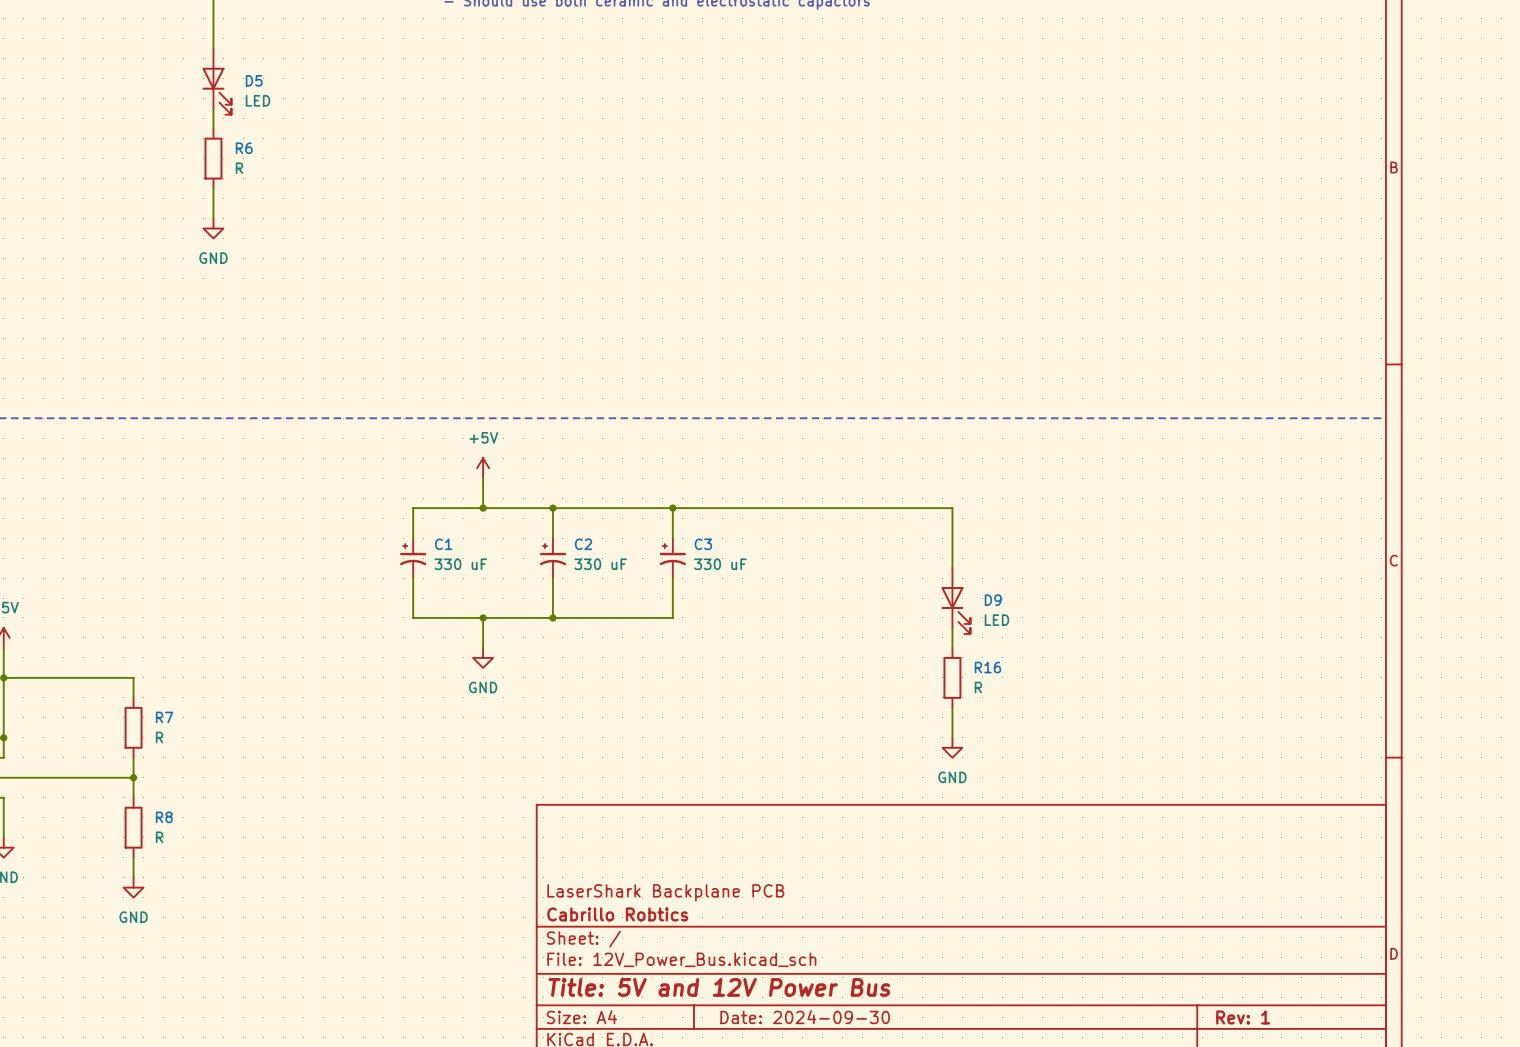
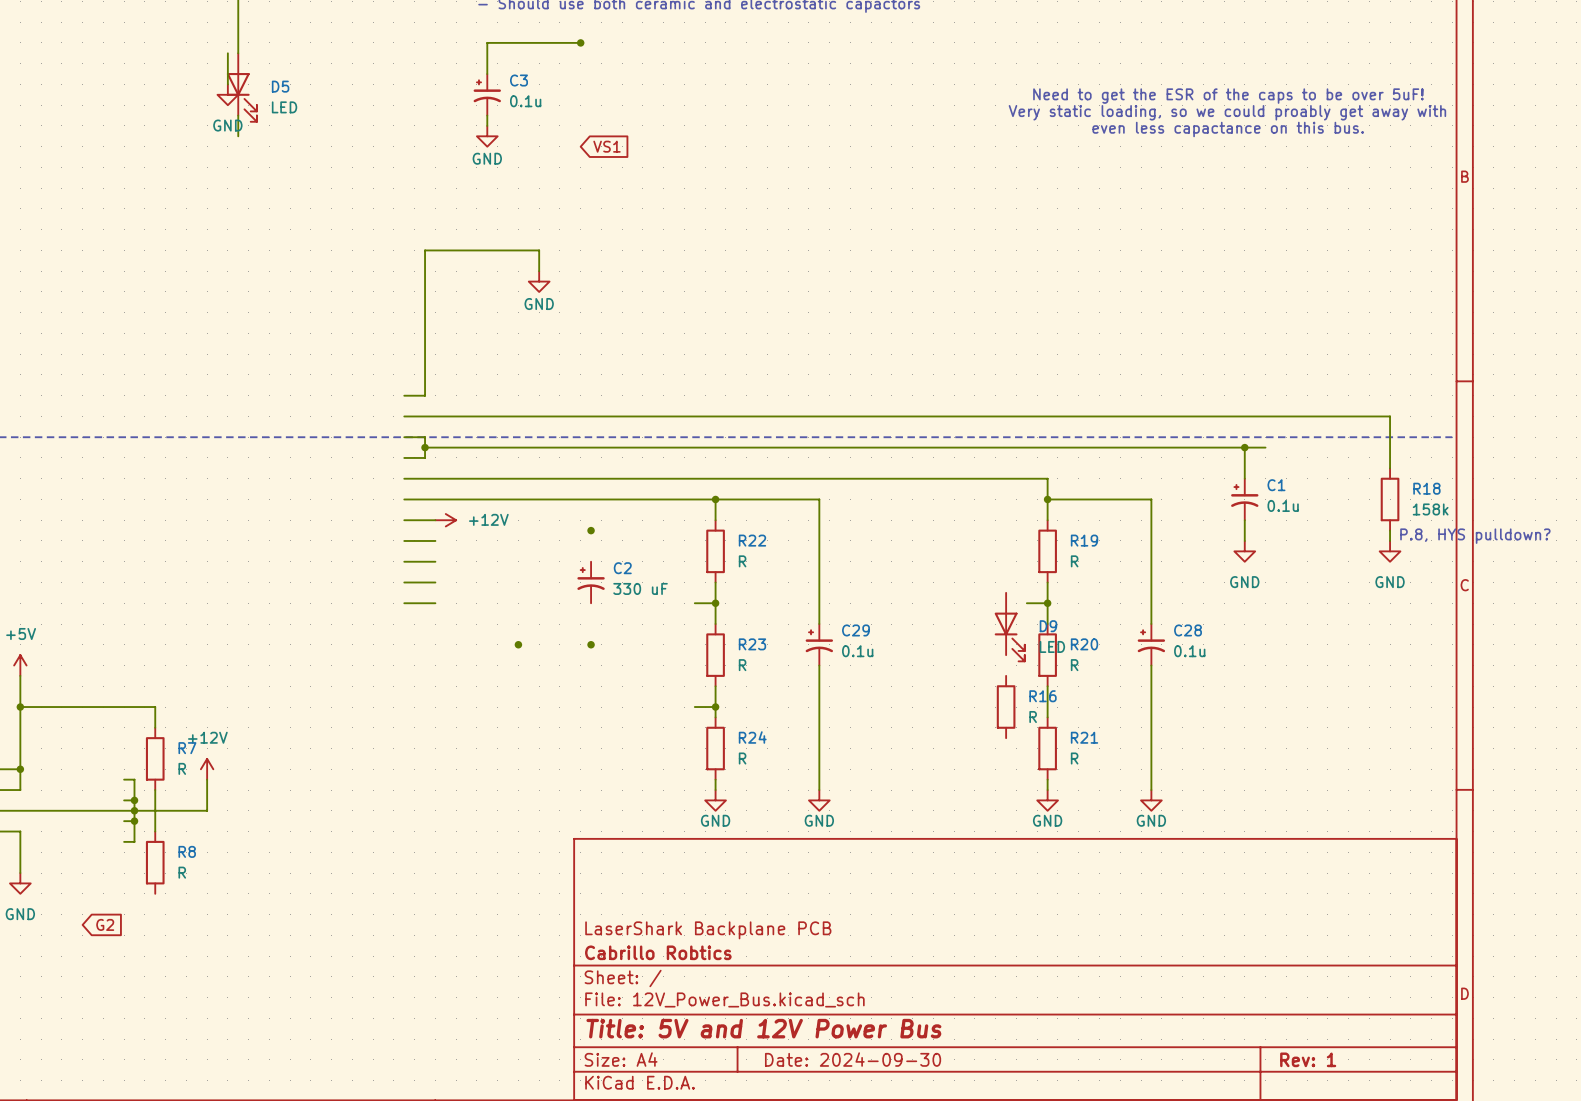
wire: none -> (580, 42) (487, 42) (487, 74)
junction: none -> (580, 42)
power symbol: none -> GND (227, 94)
text: none -> Need to get the ESR of the caps to be over 5uF! (1228, 96)
text: none -> Very static loading, so we could proably get away with (1227, 112)
wire: none -> (487, 115) (487, 125)
text: none -> even less capactance on this bus. (1228, 129)
power symbol: none -> GND (487, 136)
global label: none -> VS1 (607, 146)
R6: R (213, 158) -> none
wire: (213, 188) (213, 218) -> (227, 53) (227, 84)
power symbol: GND (213, 228) -> none
wire: none -> (539, 271) (539, 250) (425, 250) (425, 395) (404, 395)
power symbol: none -> GND (539, 281)
wire: none -> (404, 416) (1390, 416) (1390, 468)
wire: none -> (404, 437) (425, 437) (425, 457) (404, 457)
wire: none -> (425, 447) (1265, 447)
junction: none -> (425, 447)
wire: none -> (1244, 447) (1244, 478)
junction: none -> (1244, 447)
wire: none -> (404, 478) (1047, 478) (1047, 520)
power symbol: +5V (483, 468) -> none
wire: none -> (404, 499) (819, 499) (819, 624)
wire: (483, 478) (483, 508) -> none
wire: none -> (715, 499) (715, 520)
wire: none -> (1047, 499) (1151, 499) (1151, 624)
junction: none -> (1047, 499)
R18: none -> 158k (1390, 499)
wire: none -> (404, 520) (435, 520)
power symbol: none -> +12V (445, 520)
wire: none -> (1244, 520) (1244, 540)
junction: (483, 508) -> none
wire: (552, 508) (552, 538) -> none
wire: (672, 508) (672, 538) -> (715, 686) (715, 717)
junction position: (672, 508) -> (715, 499)
wire: none -> (1390, 530) (1390, 540)
text: none -> P.8, HYS pulldown? (1475, 536)
wire: none -> (404, 540) (435, 540)
R22: none -> R (715, 551)
R19: none -> R (1047, 551)
power symbol: none -> GND (1244, 551)
power symbol: none -> GND (1390, 551)
wire: none -> (404, 561) (435, 561)
wire: (413, 538) (413, 508) (952, 508) (952, 568) -> none
wire: none -> (404, 582) (435, 582)
C1 position: (413, 558) -> (1244, 499)
wire: none -> (715, 582) (715, 603) (694, 603)
C3 position: (672, 558) -> (487, 94)
wire: none -> (1047, 582) (1047, 624)
C1 value: 330 uF (460, 564) -> 0.1u (1283, 505)
C3 value: 330 uF (720, 564) -> 0.1u (525, 101)
wire: none -> (404, 603) (435, 603)
wire: (413, 578) (413, 617) (672, 617) (672, 598) -> none
wire: (552, 578) (552, 617) -> none
junction: none -> (715, 603)
wire: none -> (1026, 603) (1047, 603)
junction: none -> (1047, 603)
wire: (483, 617) (483, 647) -> none
C29: none -> 0.1u (819, 644)
C28: none -> 0.1u (1151, 644)
R23: none -> R (715, 655)
wire: (952, 627) (952, 647) -> none
R20: none -> R (1047, 655)
wire: none -> (819, 665) (819, 790)
wire: none -> (1151, 665) (1151, 790)
power symbol: GND (483, 657) -> none
wire: none -> (694, 707) (715, 707)
junction: none -> (715, 707)
wire: (952, 707) (952, 737) -> (1047, 686) (1047, 717)
R24: none -> R (715, 748)
R21: none -> R (1047, 748)
power symbol: none -> +12V (207, 769)
wire: none -> (124, 779) (134, 779) (134, 841) (124, 841)
wire: none -> (207, 779) (207, 810) (155, 810)
wire: none -> (715, 779) (715, 790)
power symbol position: GND (952, 747) -> GND (1047, 800)
wire: none -> (1047, 779) (1047, 790)
wire: none -> (124, 800) (134, 800)
junction: none -> (134, 800)
power symbol: none -> GND (715, 800)
power symbol: none -> GND (819, 800)
power symbol: none -> GND (1151, 800)
junction: none -> (134, 810)
junction: (133, 777) -> none
power symbol text position: GND (952, 777) -> GND (1047, 820)
wire: none -> (124, 821) (134, 821)
junction: none -> (134, 821)
wire: (133, 857) (133, 877) -> none
global label: none -> G2 (105, 924)
power symbol: GND (133, 887) -> none

